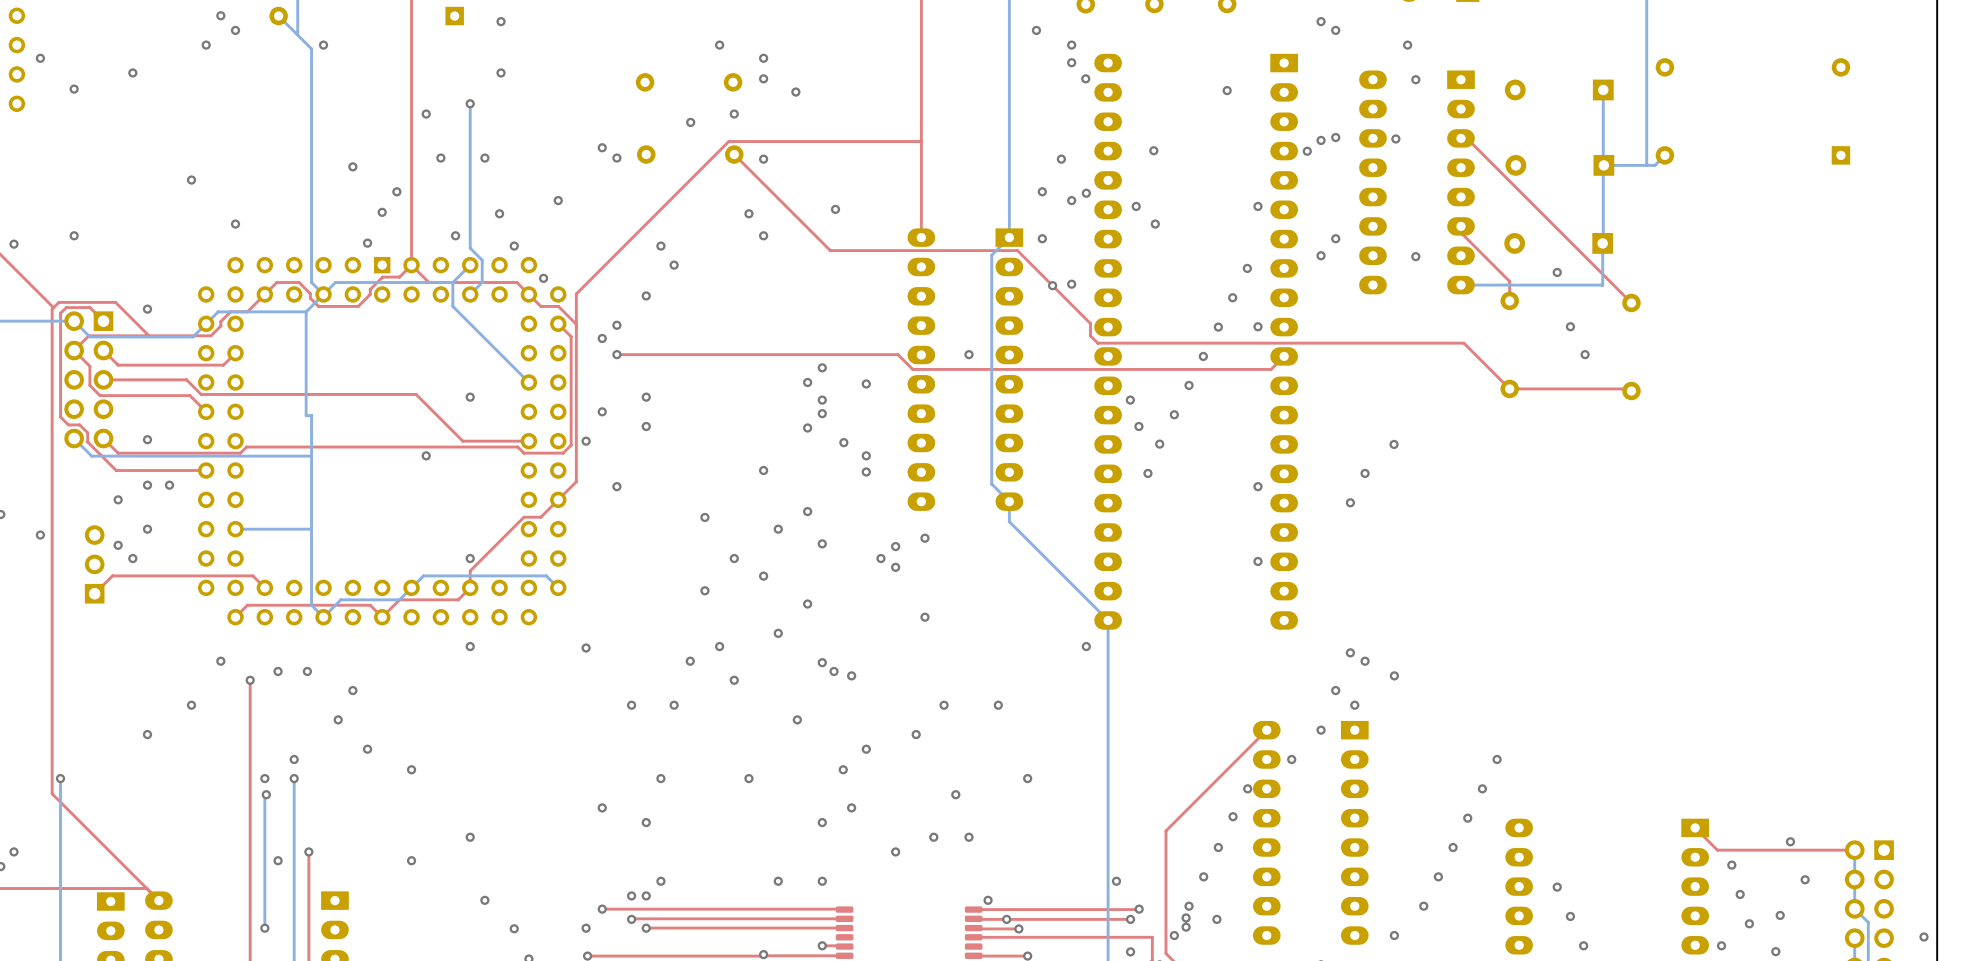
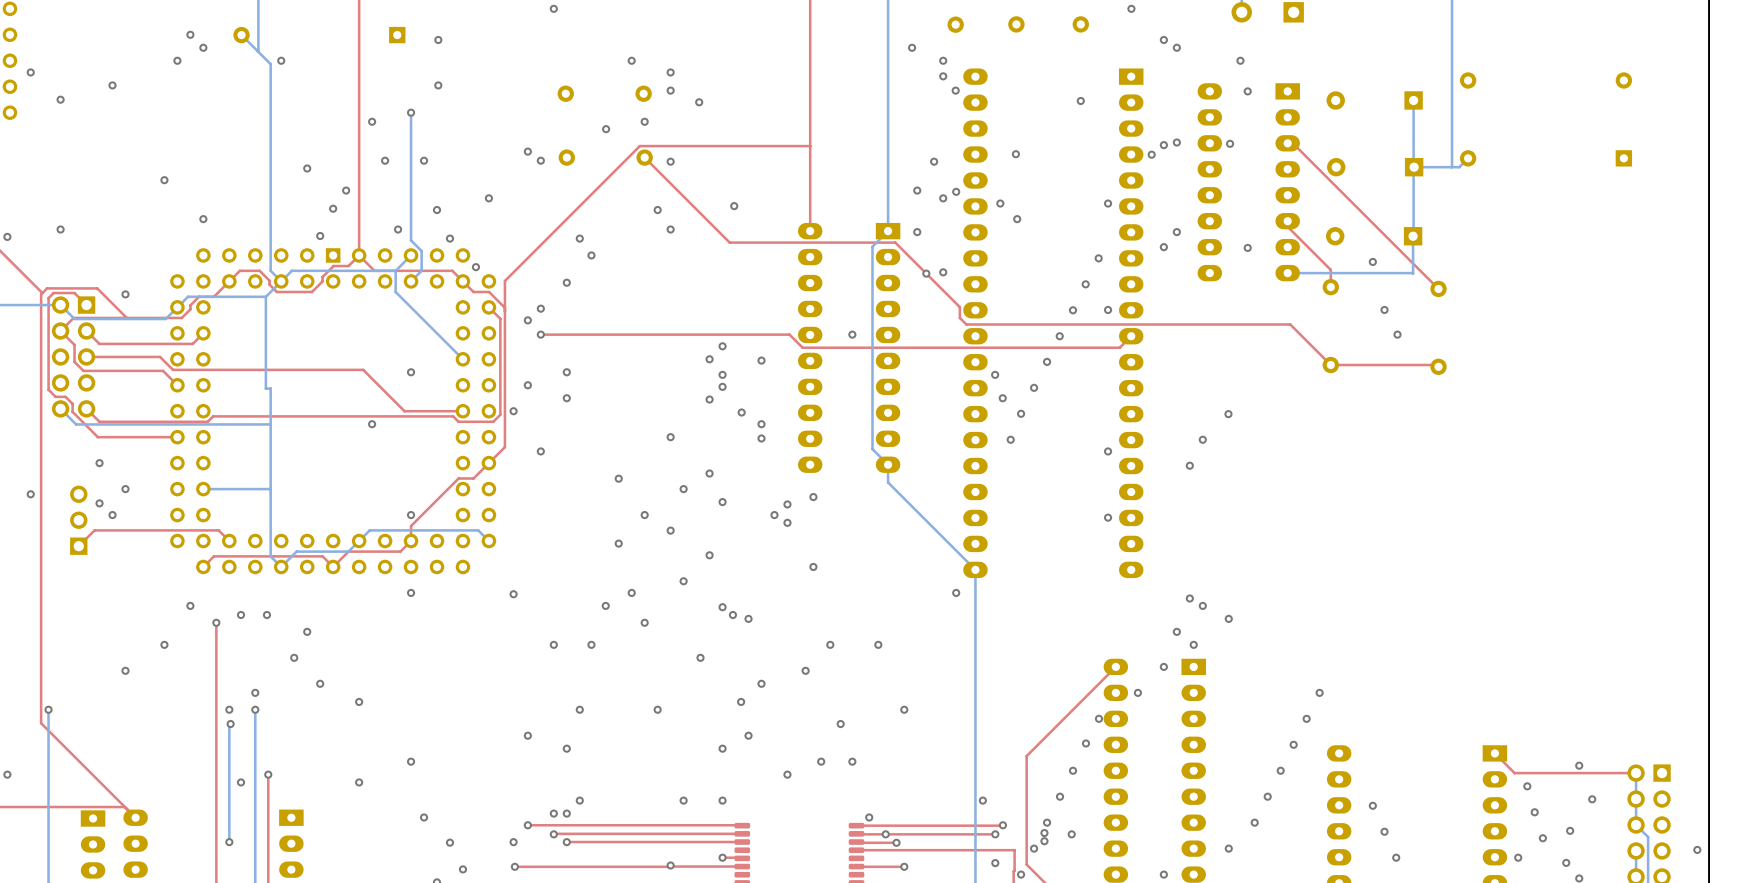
via: (147, 439) -> none
via: (147, 485) -> none
via: (169, 485) -> none

